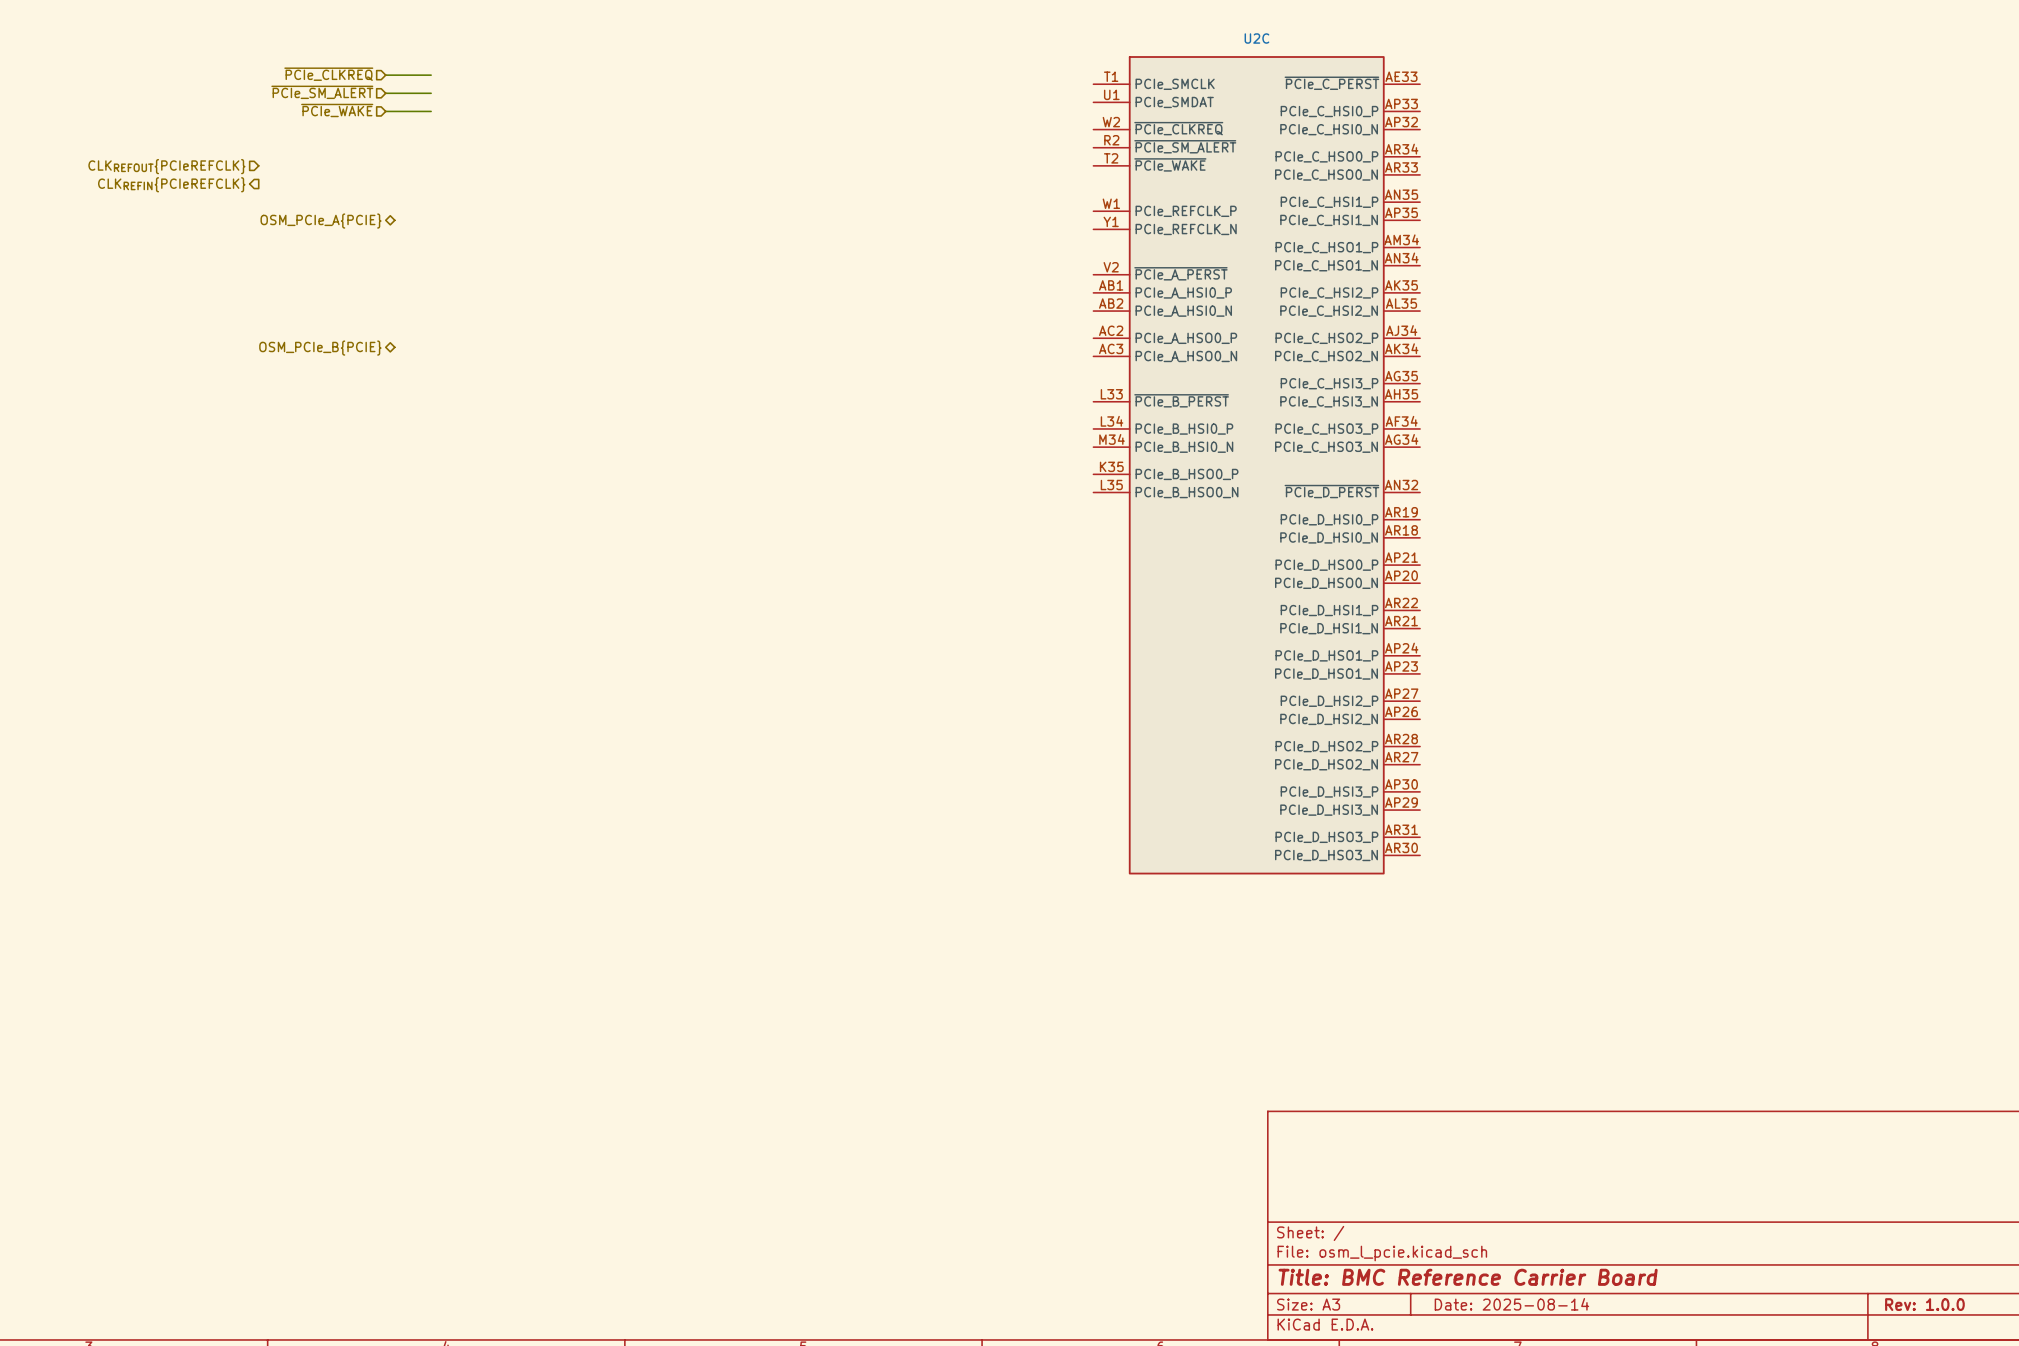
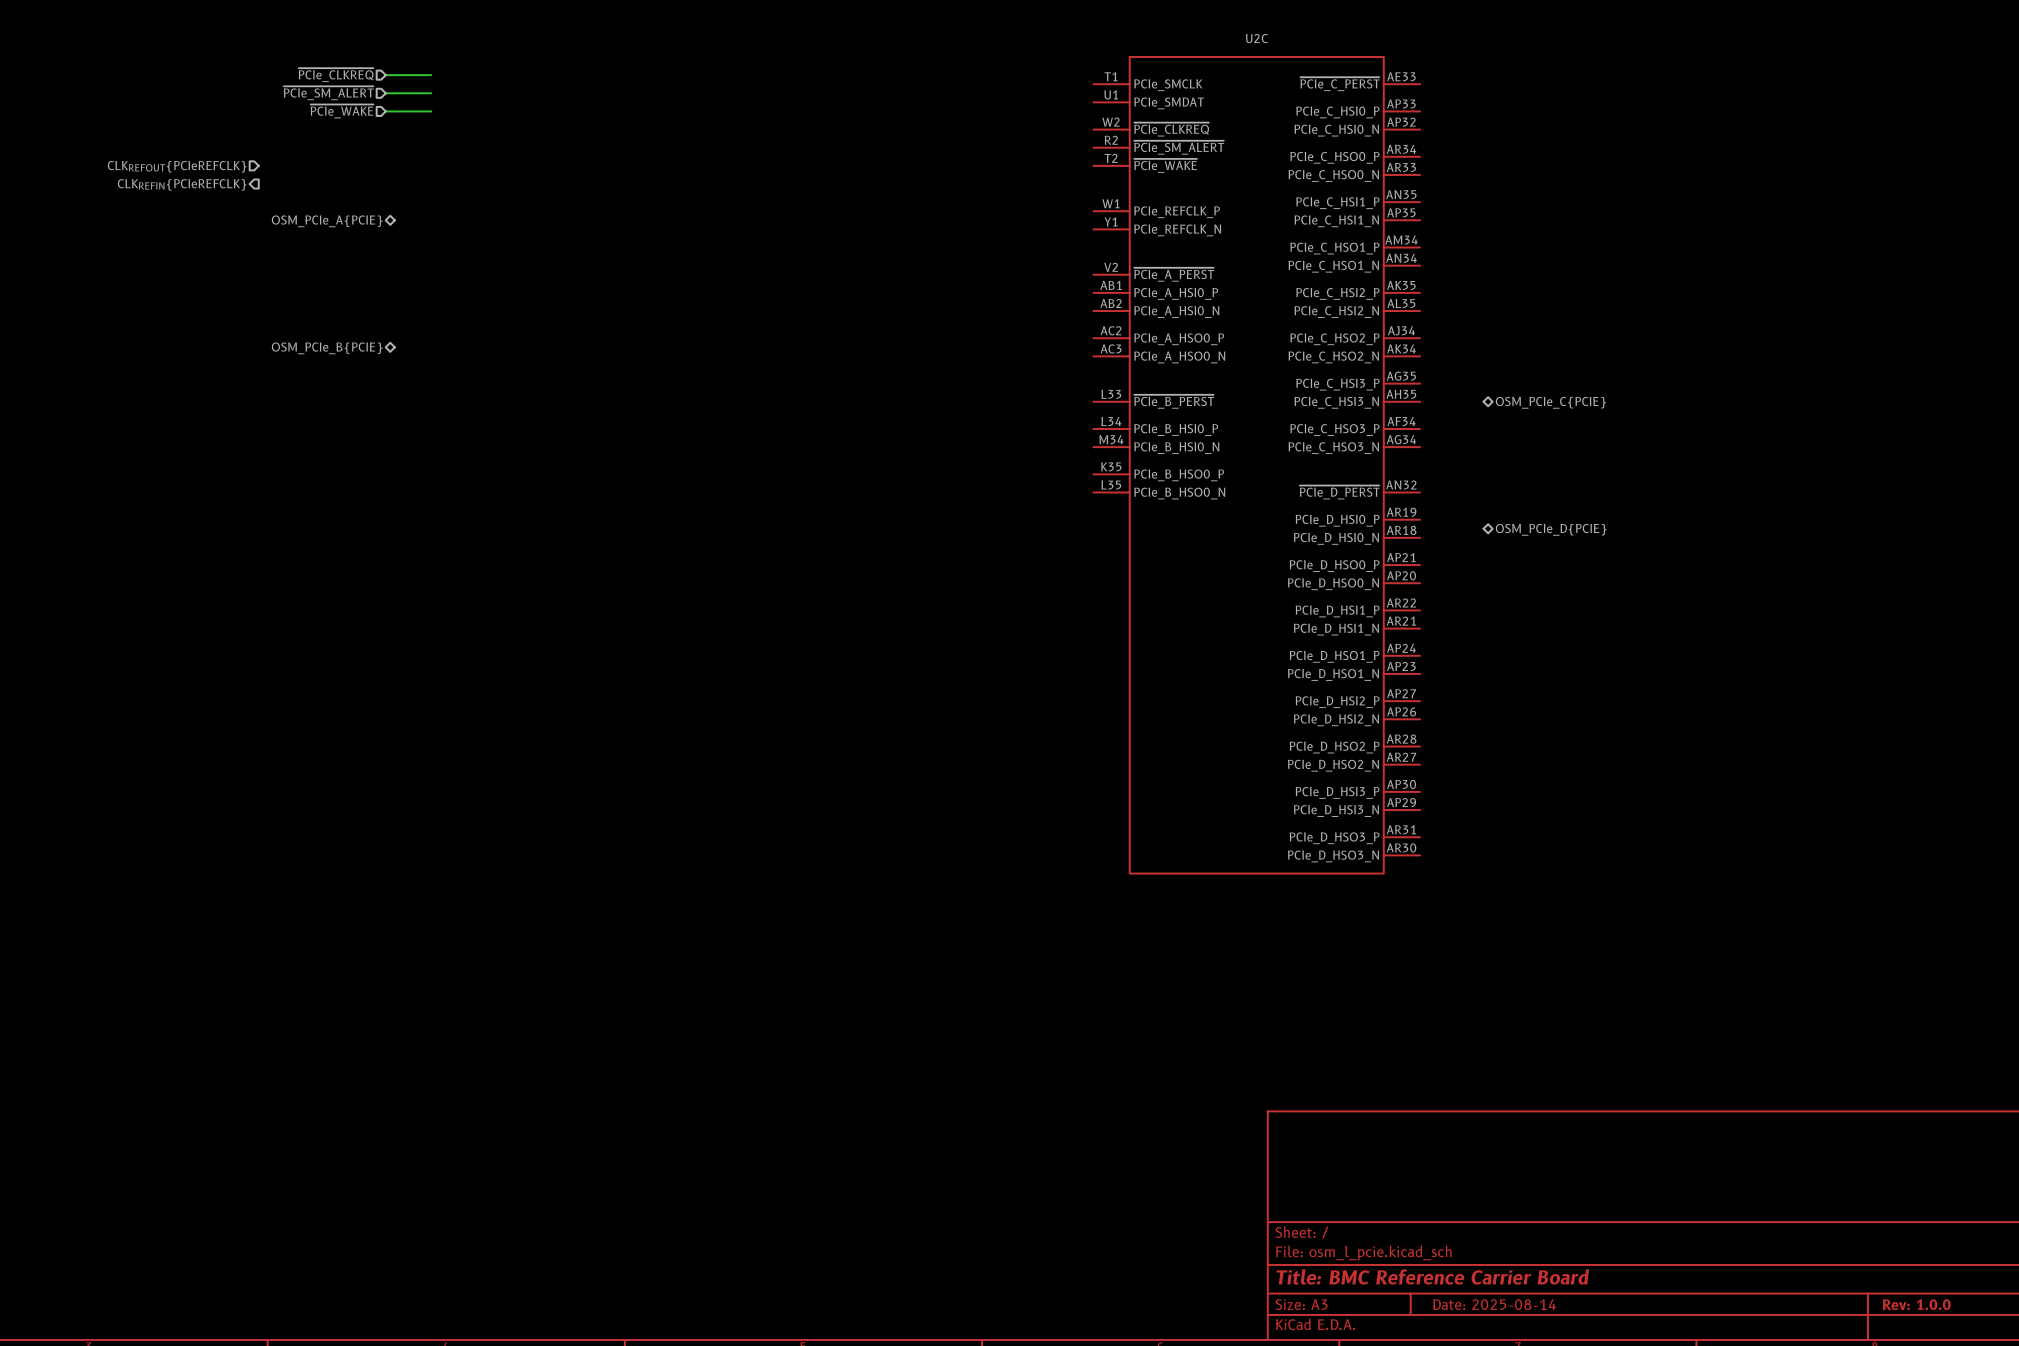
hierarchical label: none -> OSM_PCIe_C{PCIE} (1550, 402)
hierarchical label: none -> OSM_PCIe_D{PCIE} (1551, 529)

